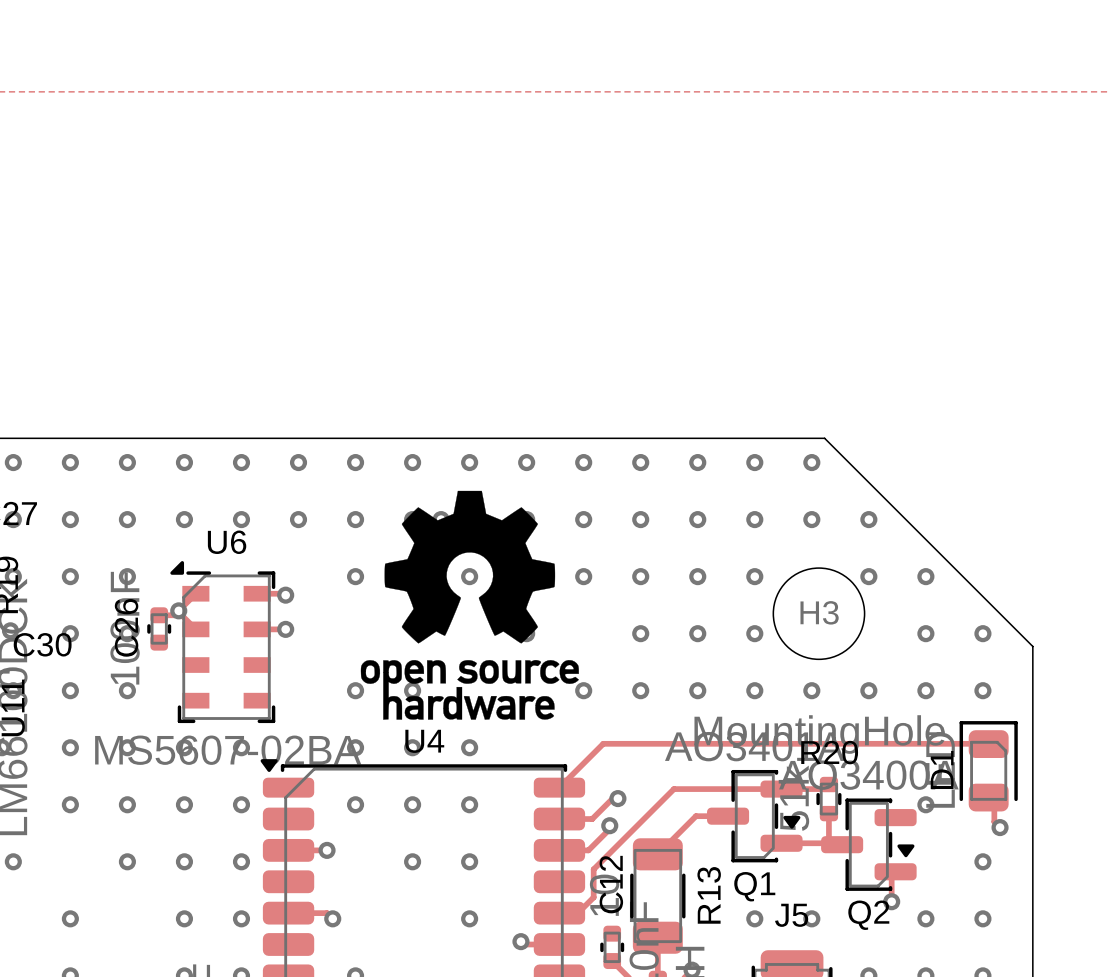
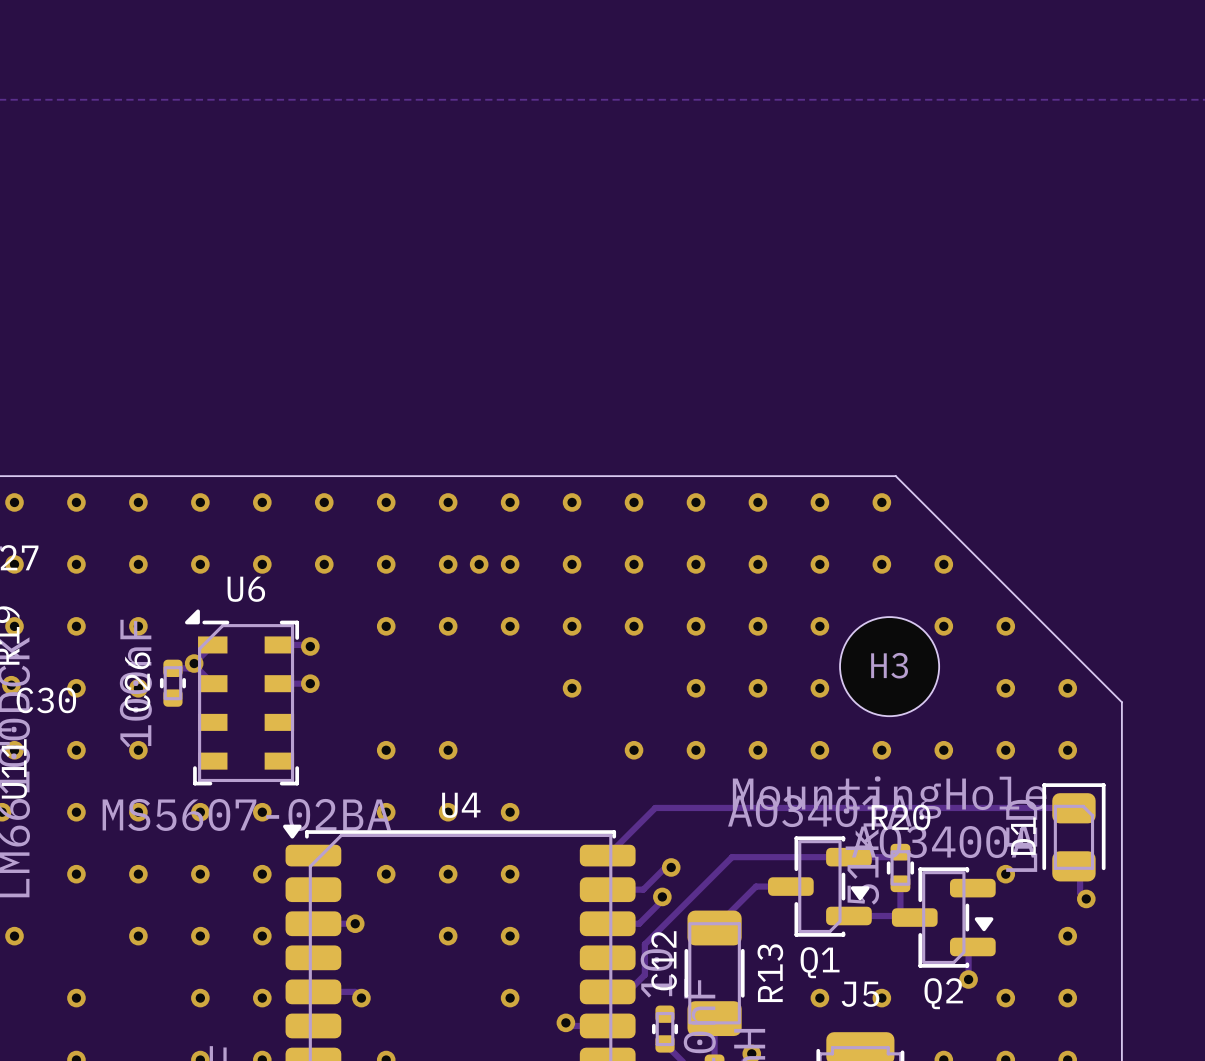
drawing: [360, 490, 579, 720] -> none

